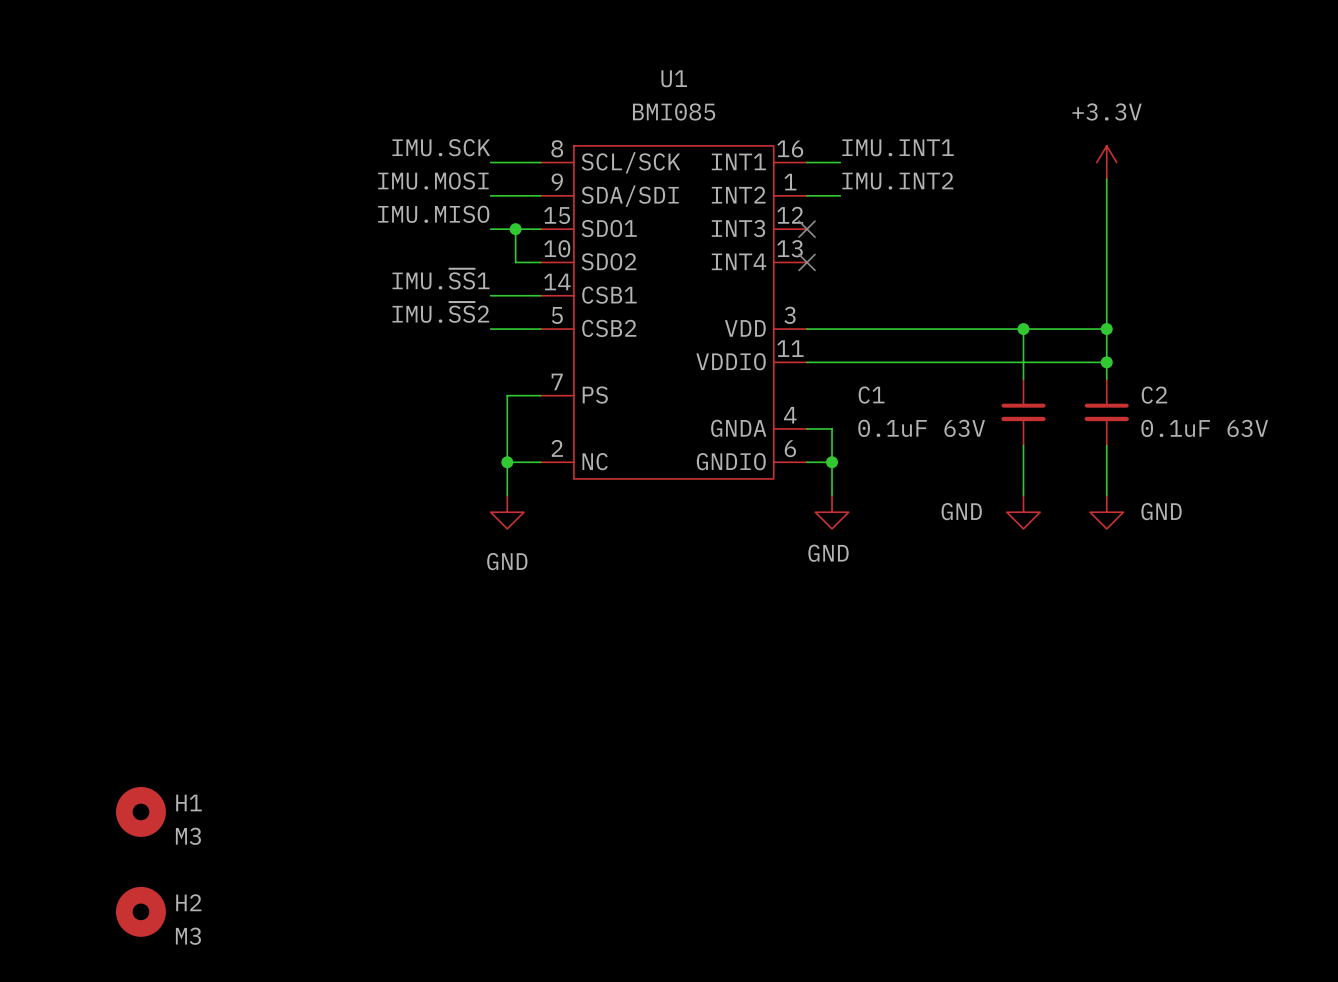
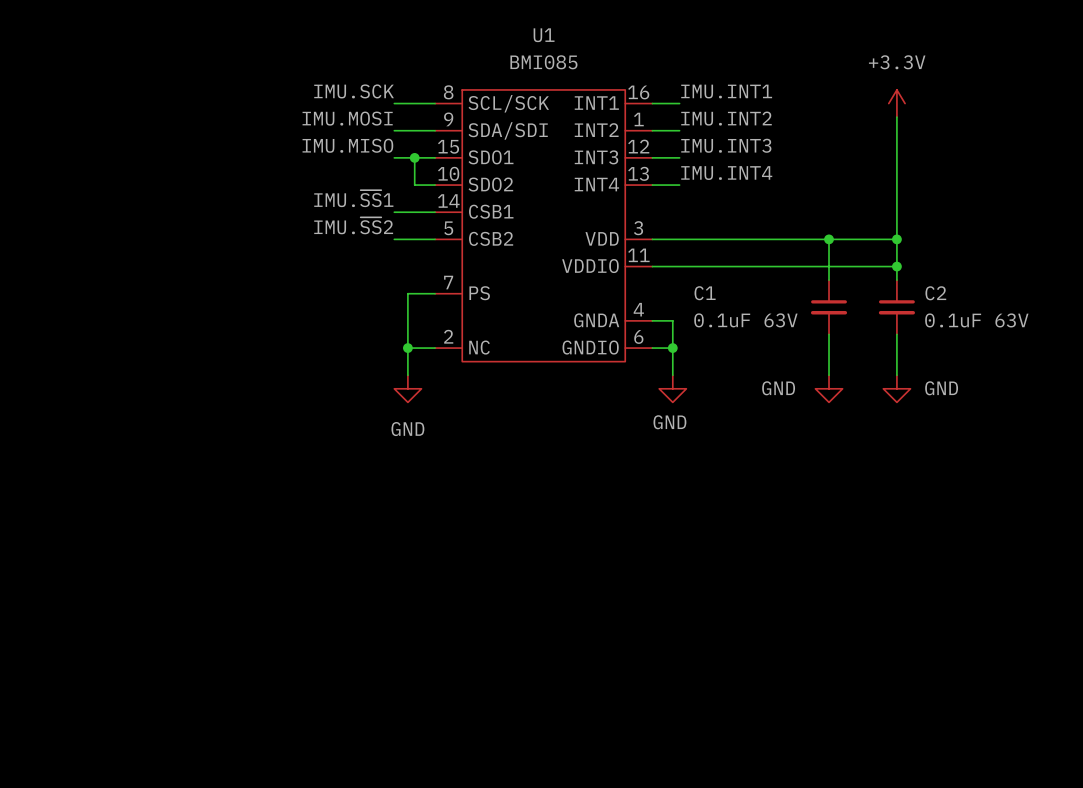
label: none -> IMU.INT3 (726, 145)
wire: none -> (652, 157) (679, 157)
no-connect mark: (807, 229) -> none
label: none -> IMU.INT4 (726, 173)
wire: none -> (652, 185) (679, 185)
no-connect mark: (807, 262) -> none
H1: M3 (140, 811) -> none
H2: M3 (140, 911) -> none

